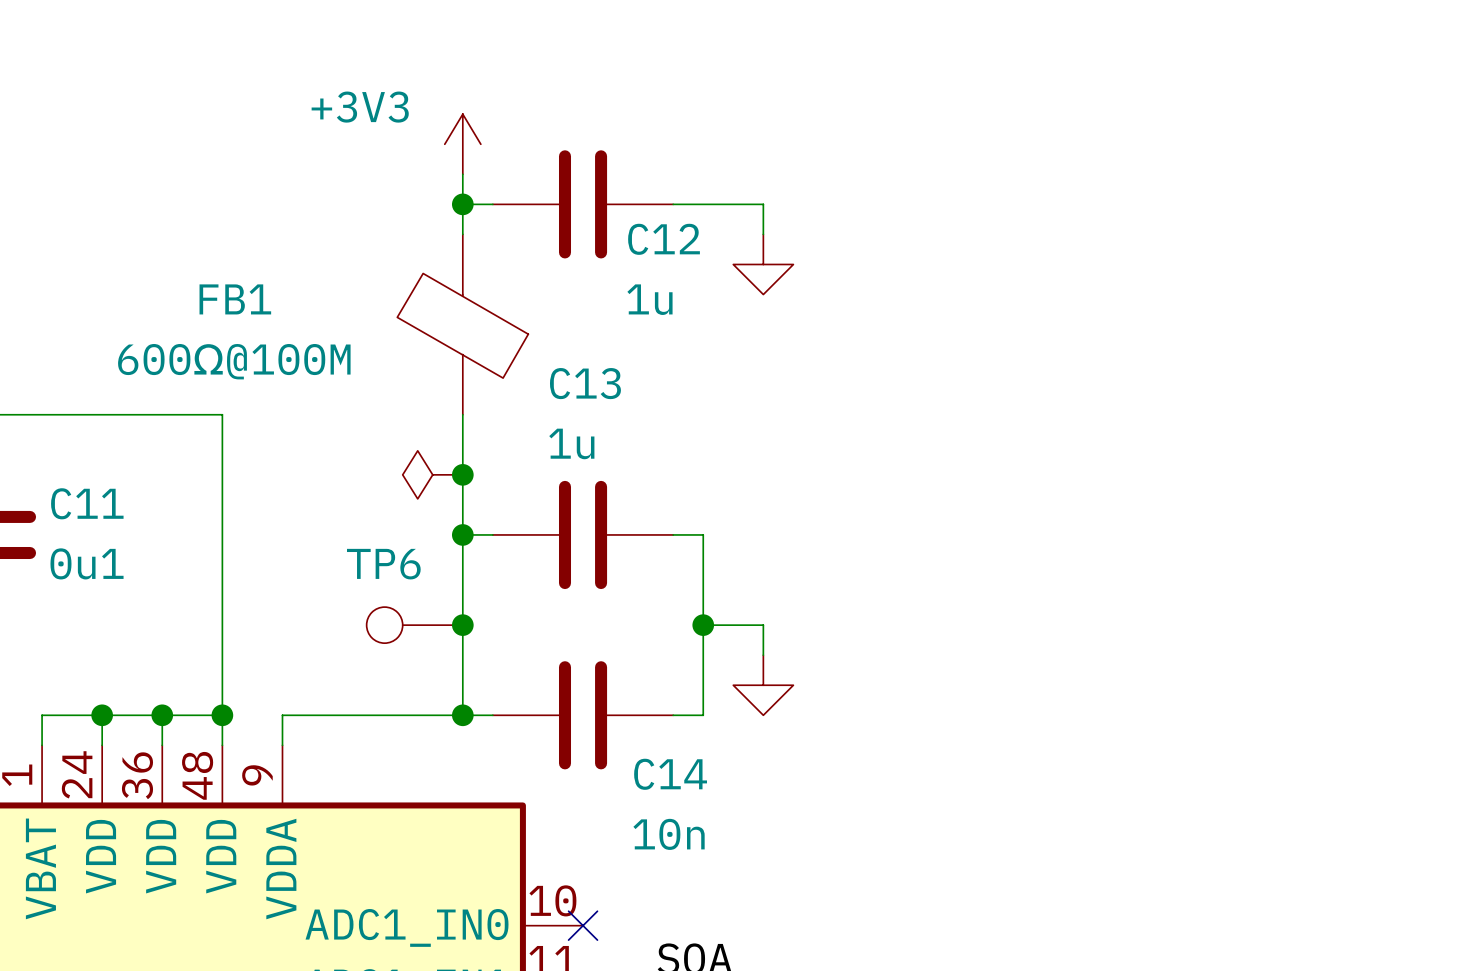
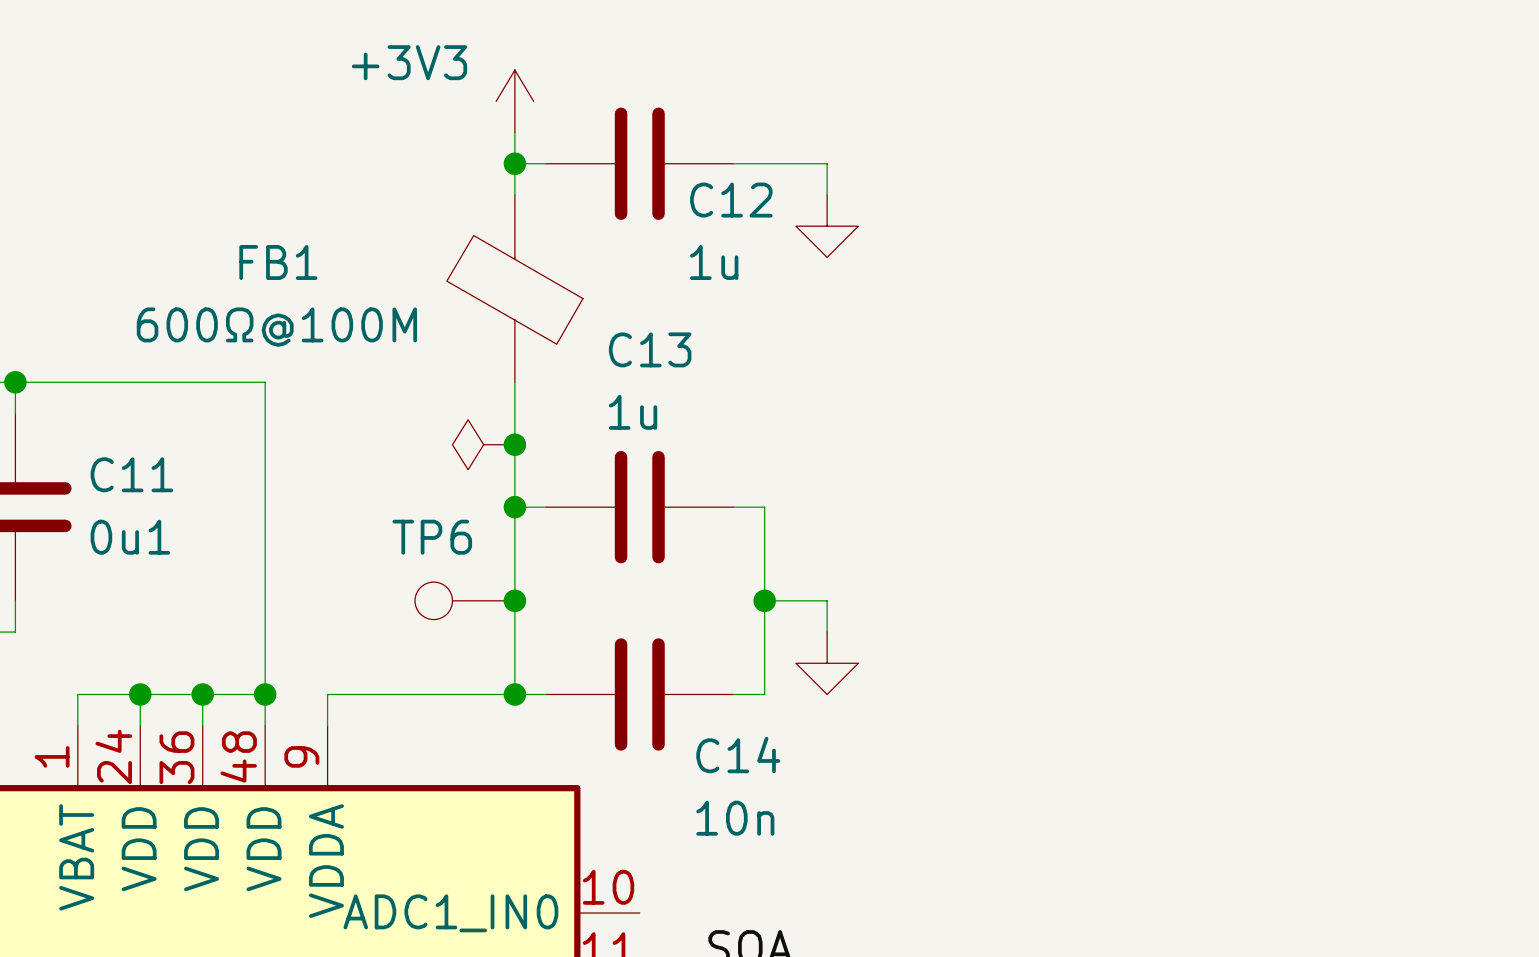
no-connect mark: (583, 925) -> none

